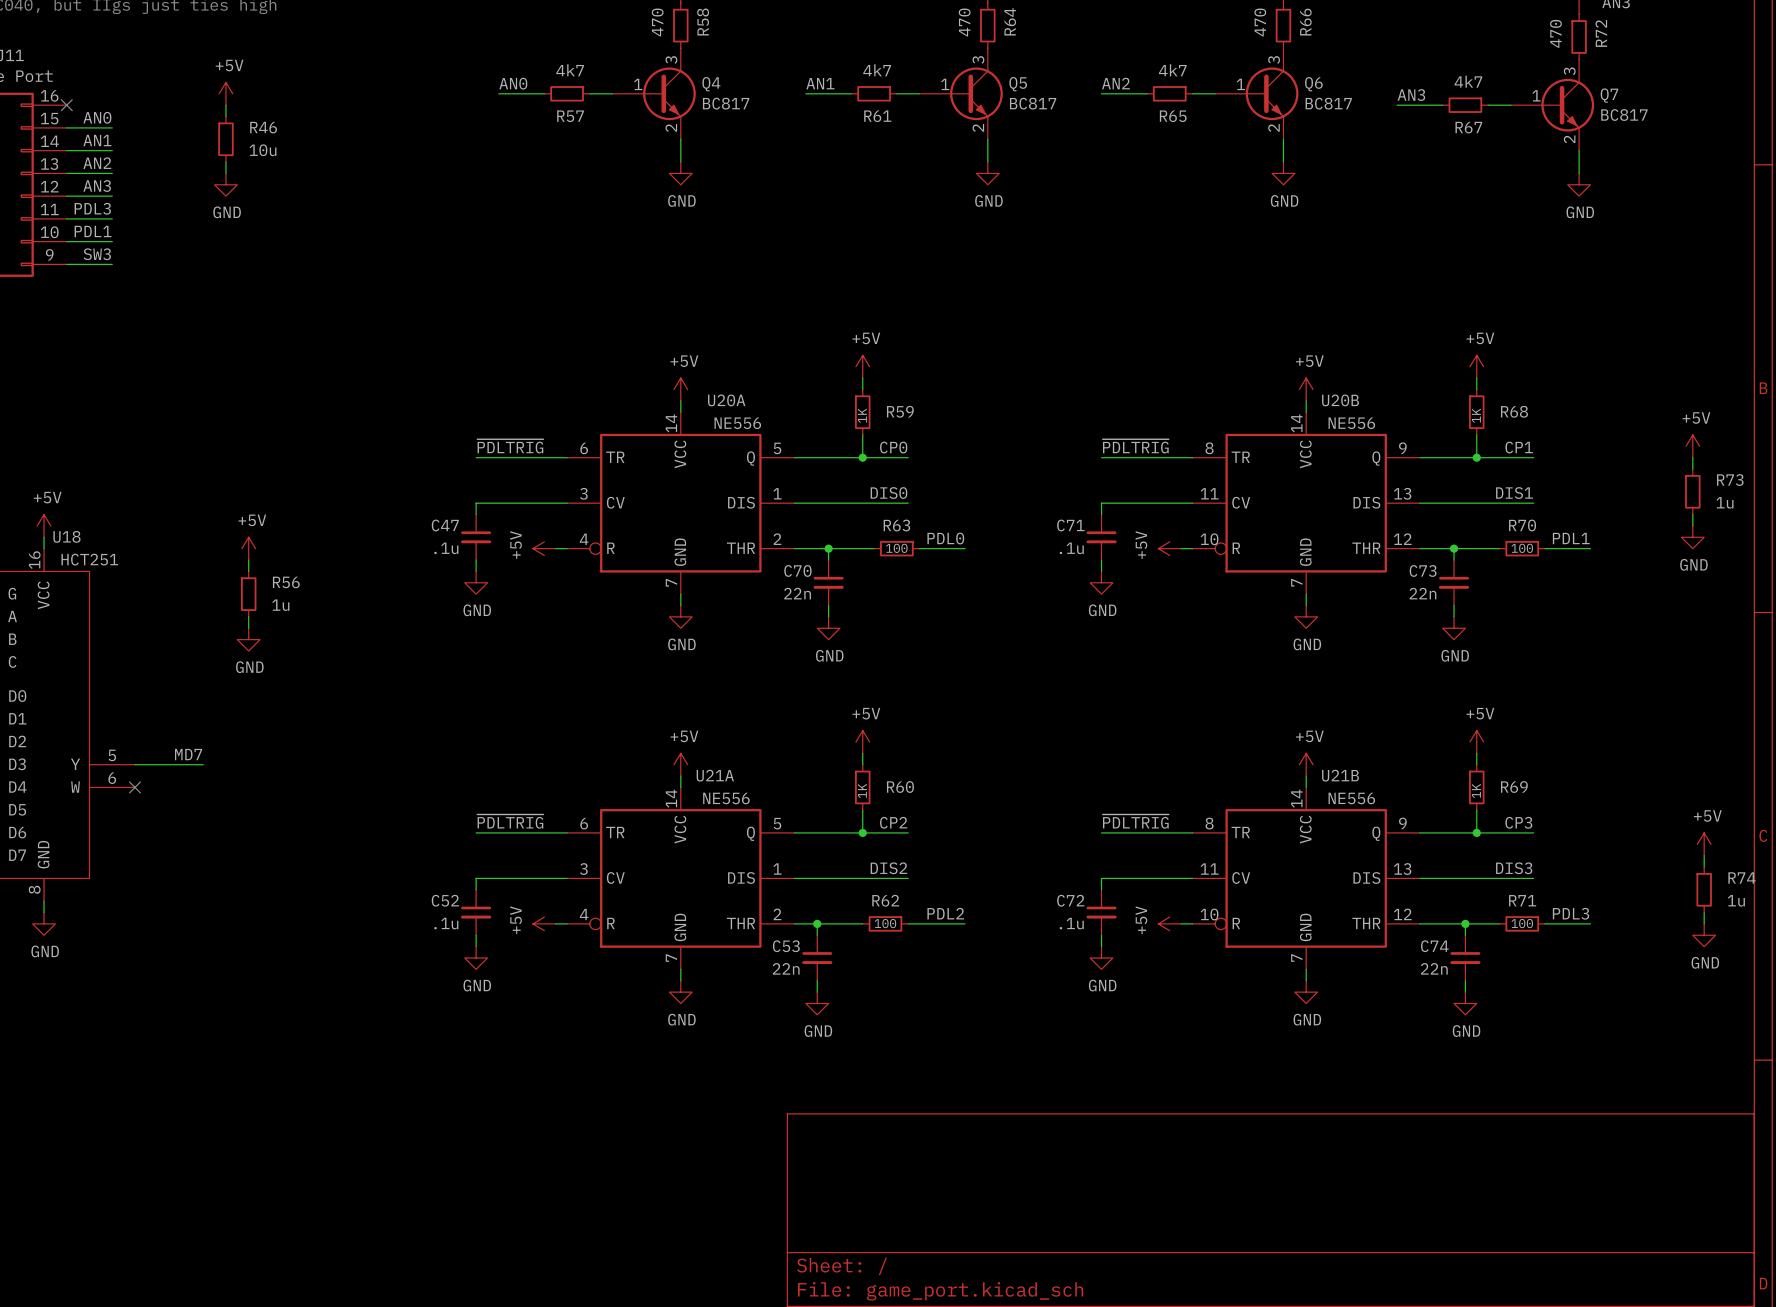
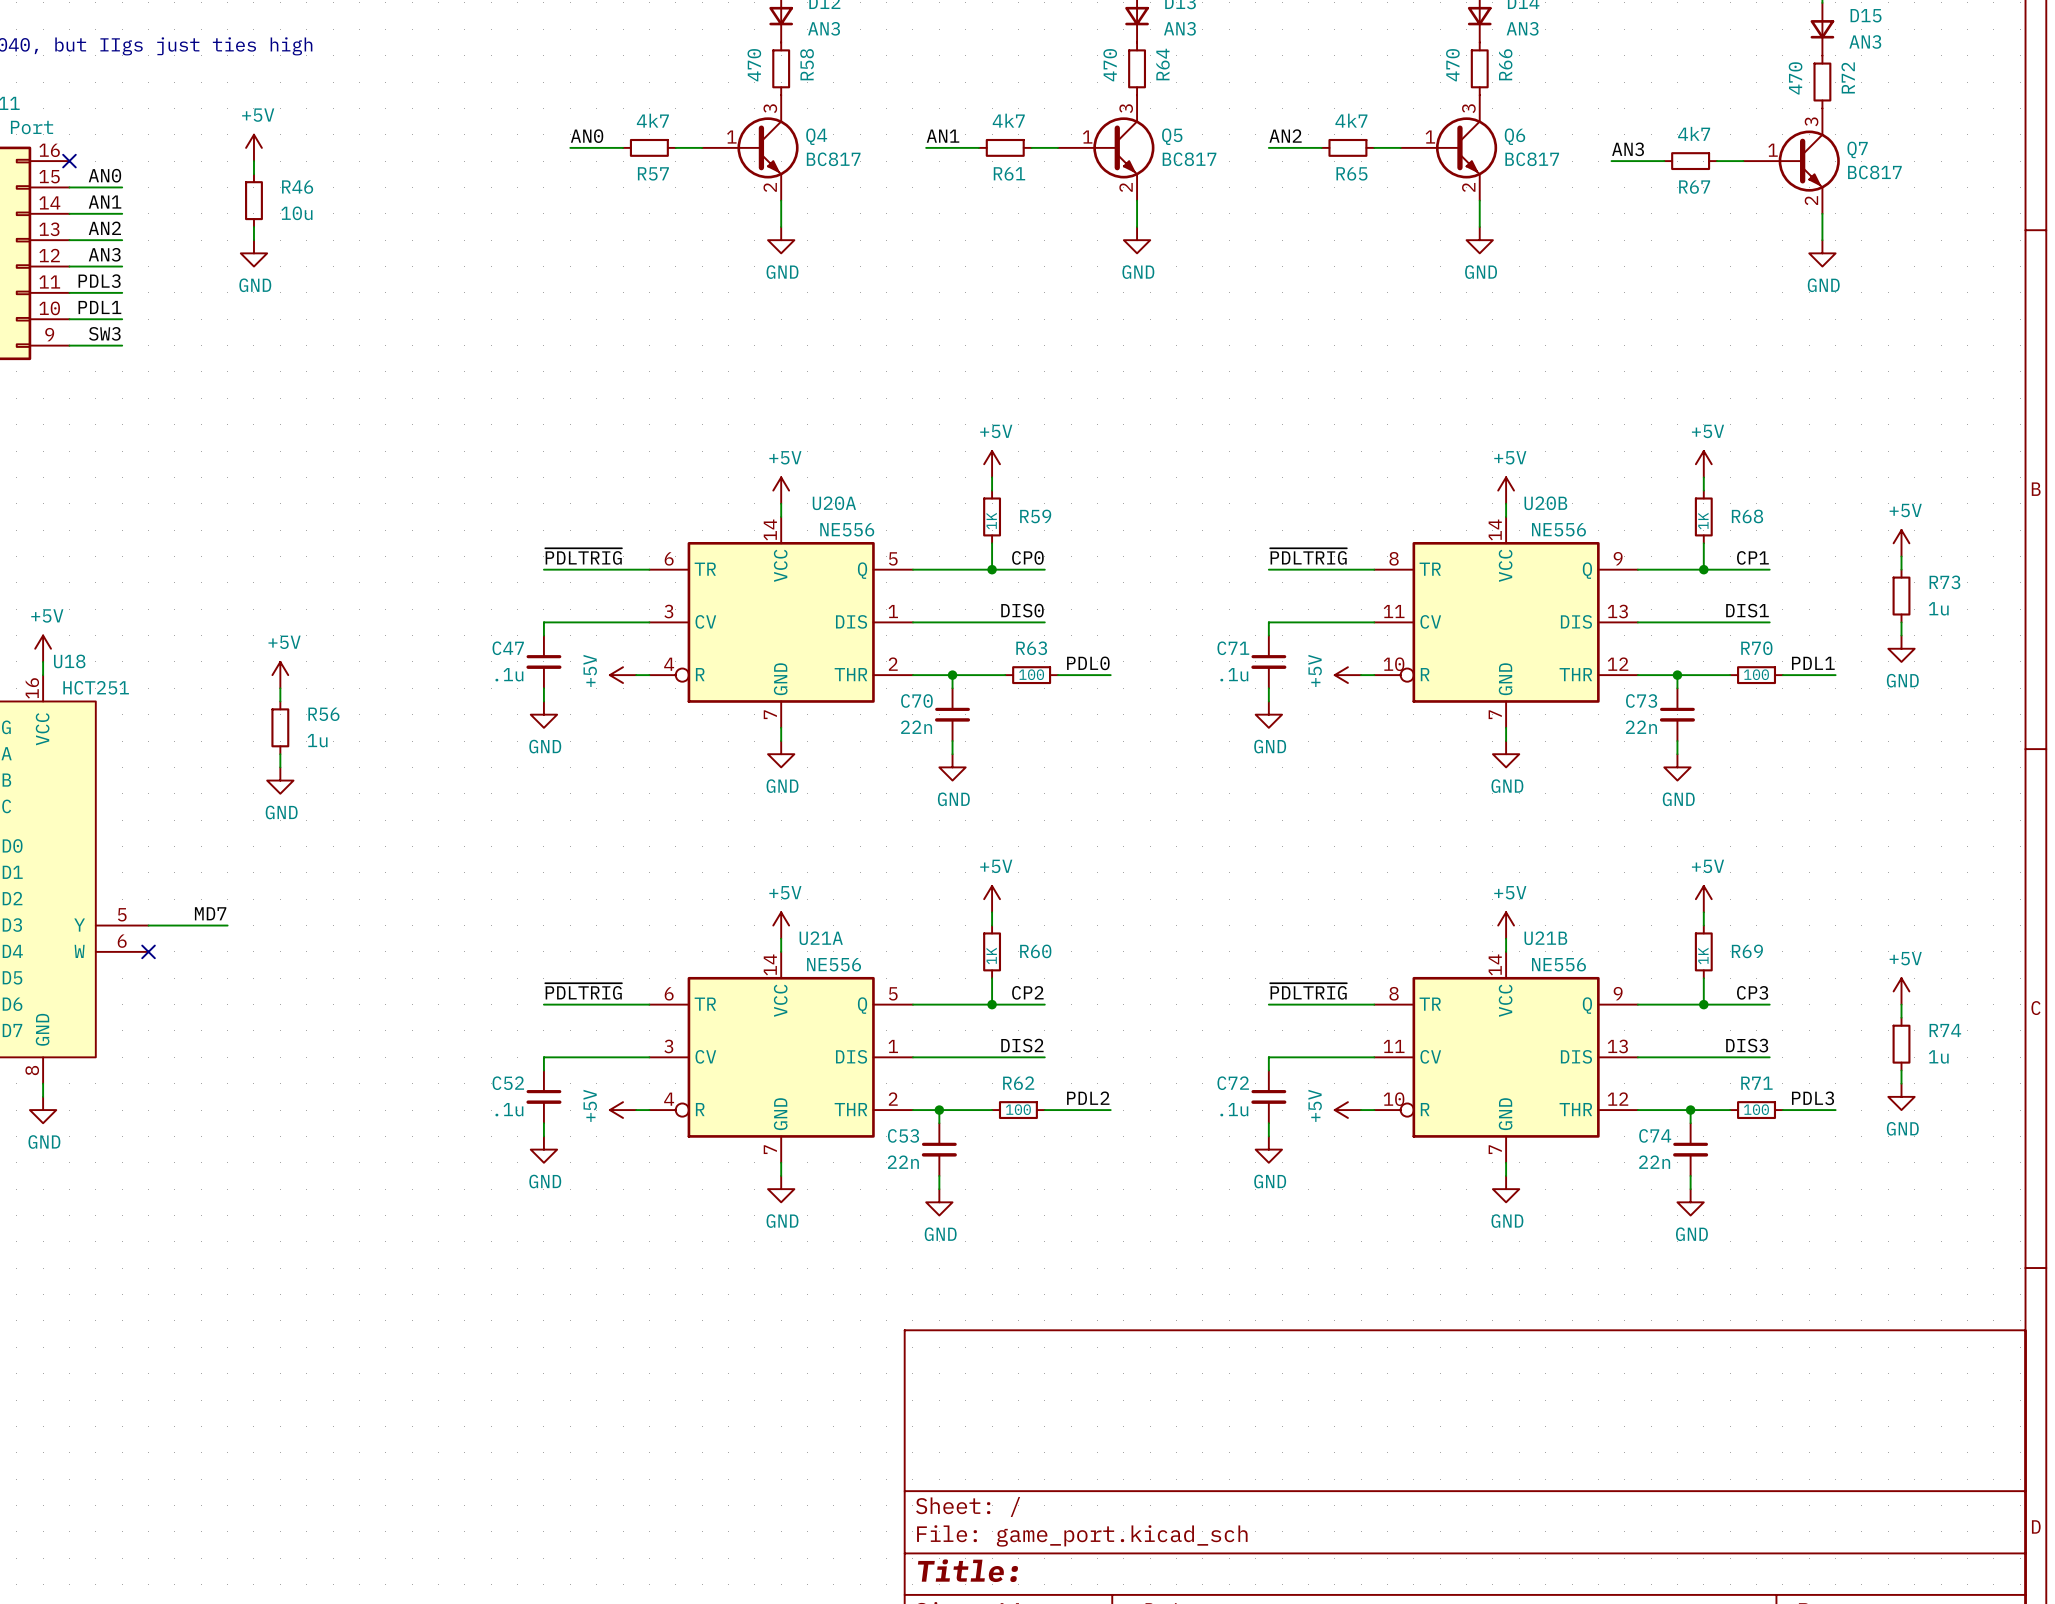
power symbol position: +5V (1692, 446) -> +5V (1901, 543)
wire: (1692, 457) (1692, 469) -> (1901, 556) (1901, 569)
R73 position: (1692, 491) -> (1901, 596)
wire: (1692, 514) (1692, 525) -> (1901, 622) (1901, 635)
power symbol position: GND (1692, 537) -> GND (1901, 648)
power symbol position: +5V (1704, 844) -> +5V (1901, 991)
wire: (1704, 855) (1704, 867) -> (1901, 1004) (1901, 1017)
R74 position: (1704, 889) -> (1901, 1044)
wire: (1704, 912) (1704, 923) -> (1901, 1070) (1901, 1083)
power symbol position: GND (1704, 935) -> GND (1901, 1096)

